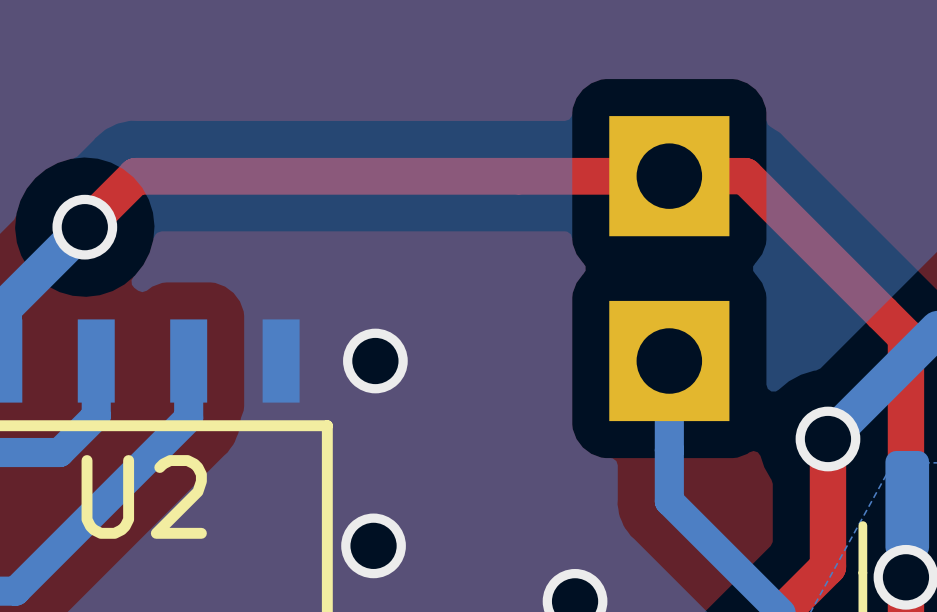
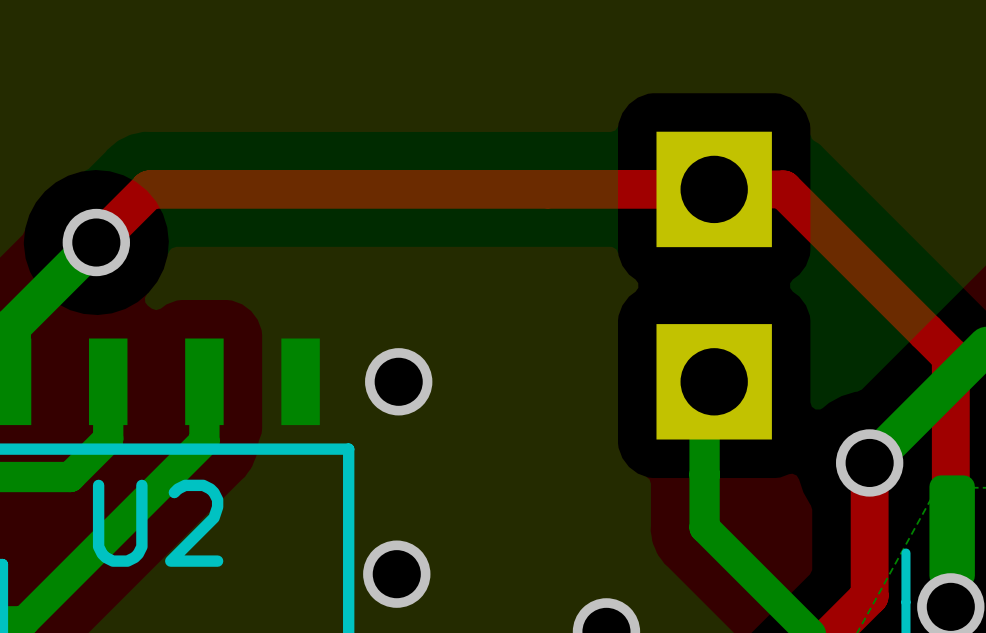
part footprint: [609, 116, 730, 422] -> [656, 131, 772, 440]

